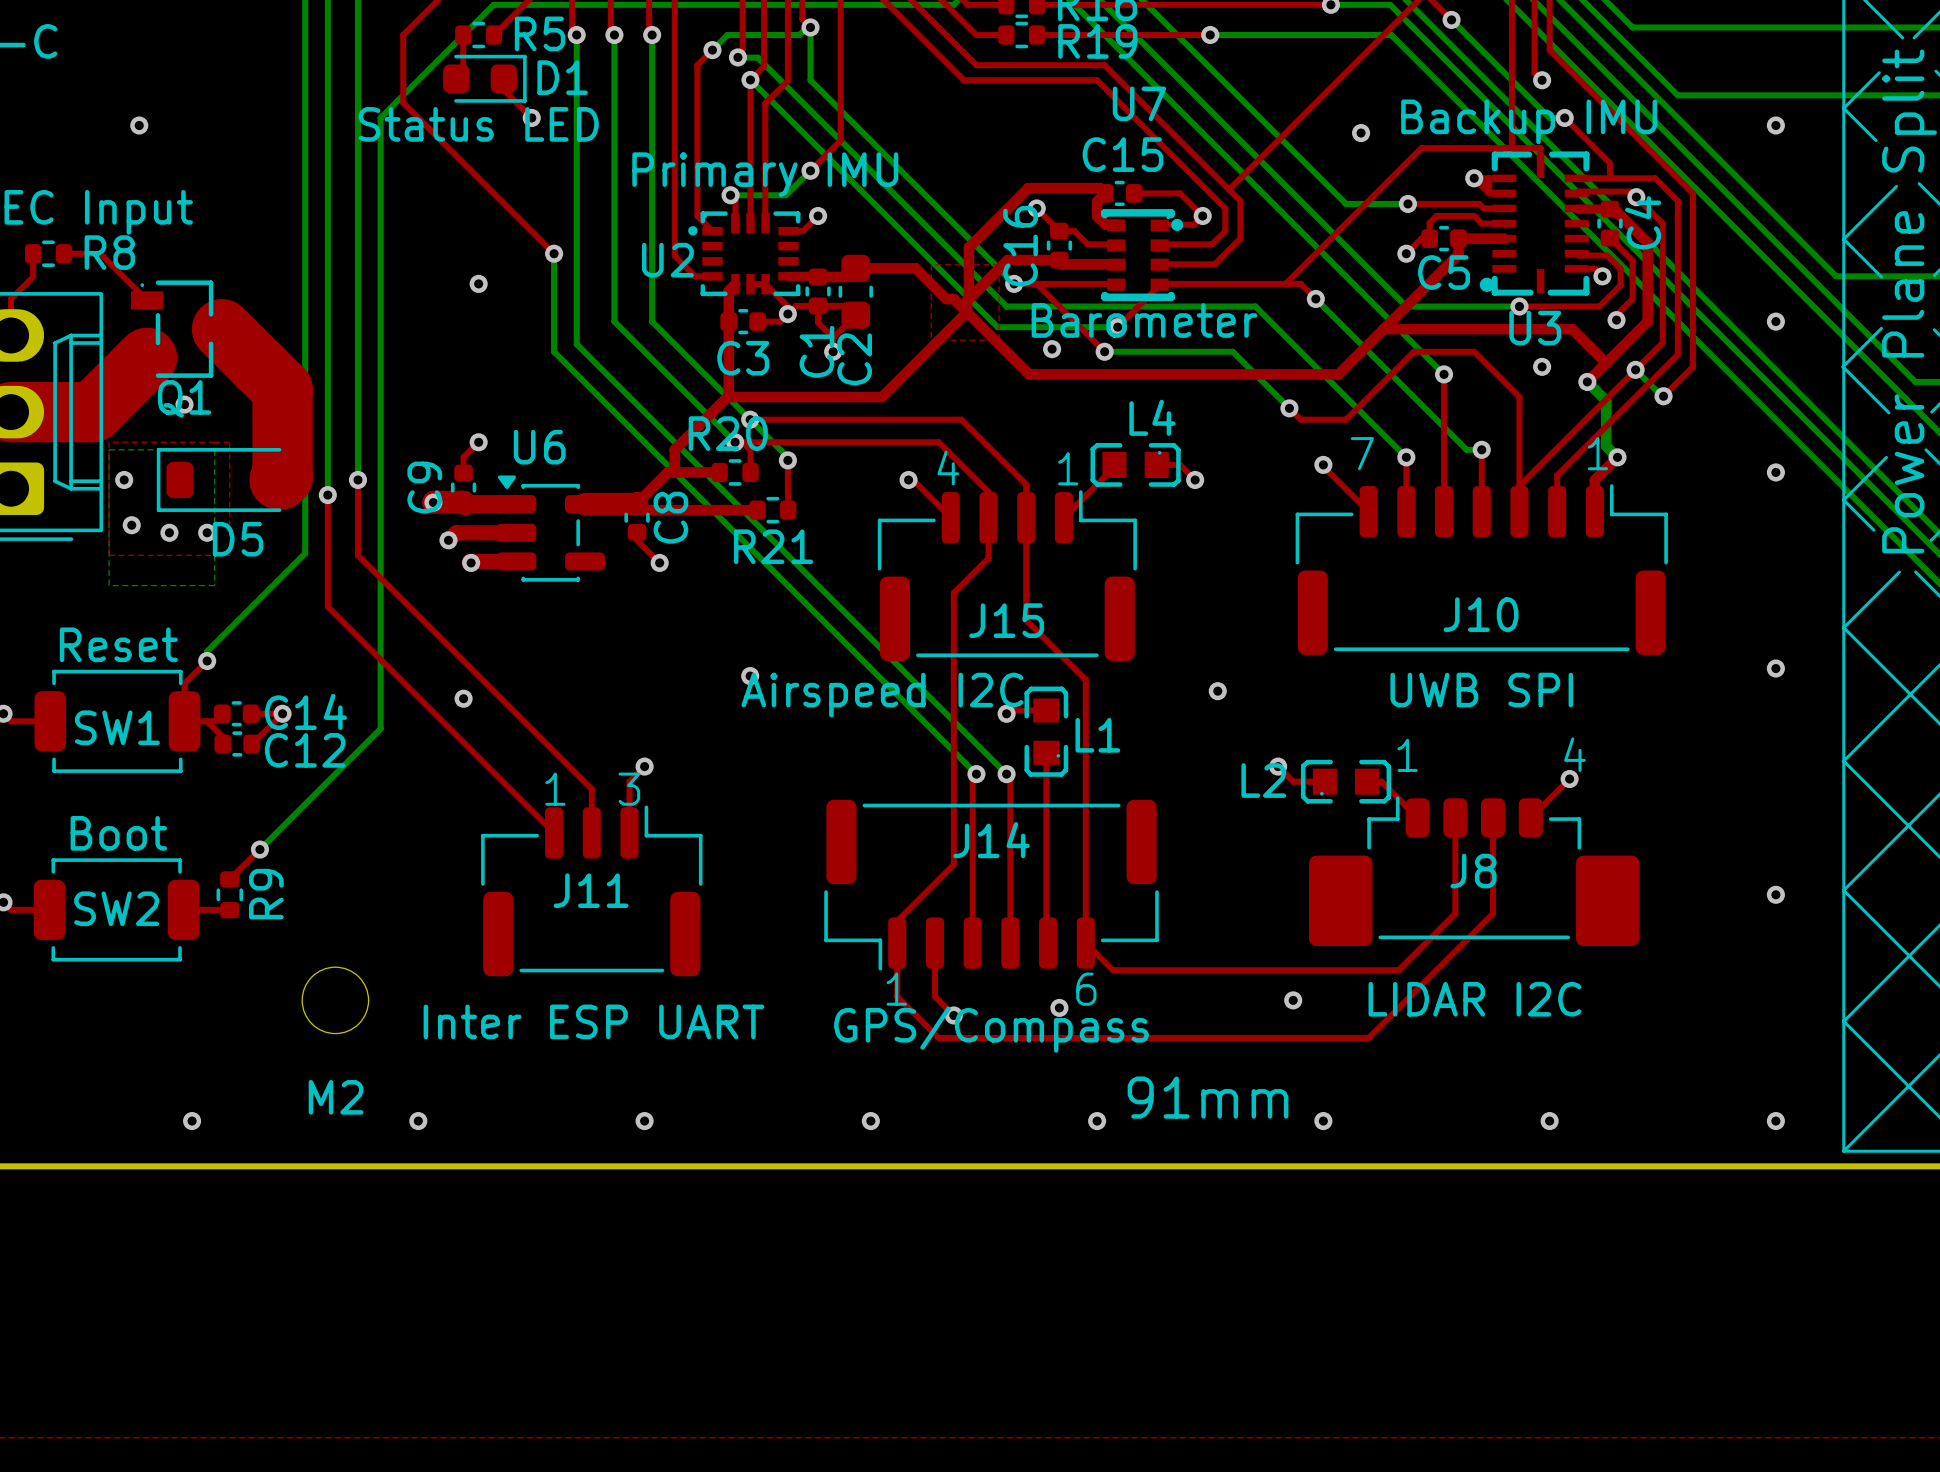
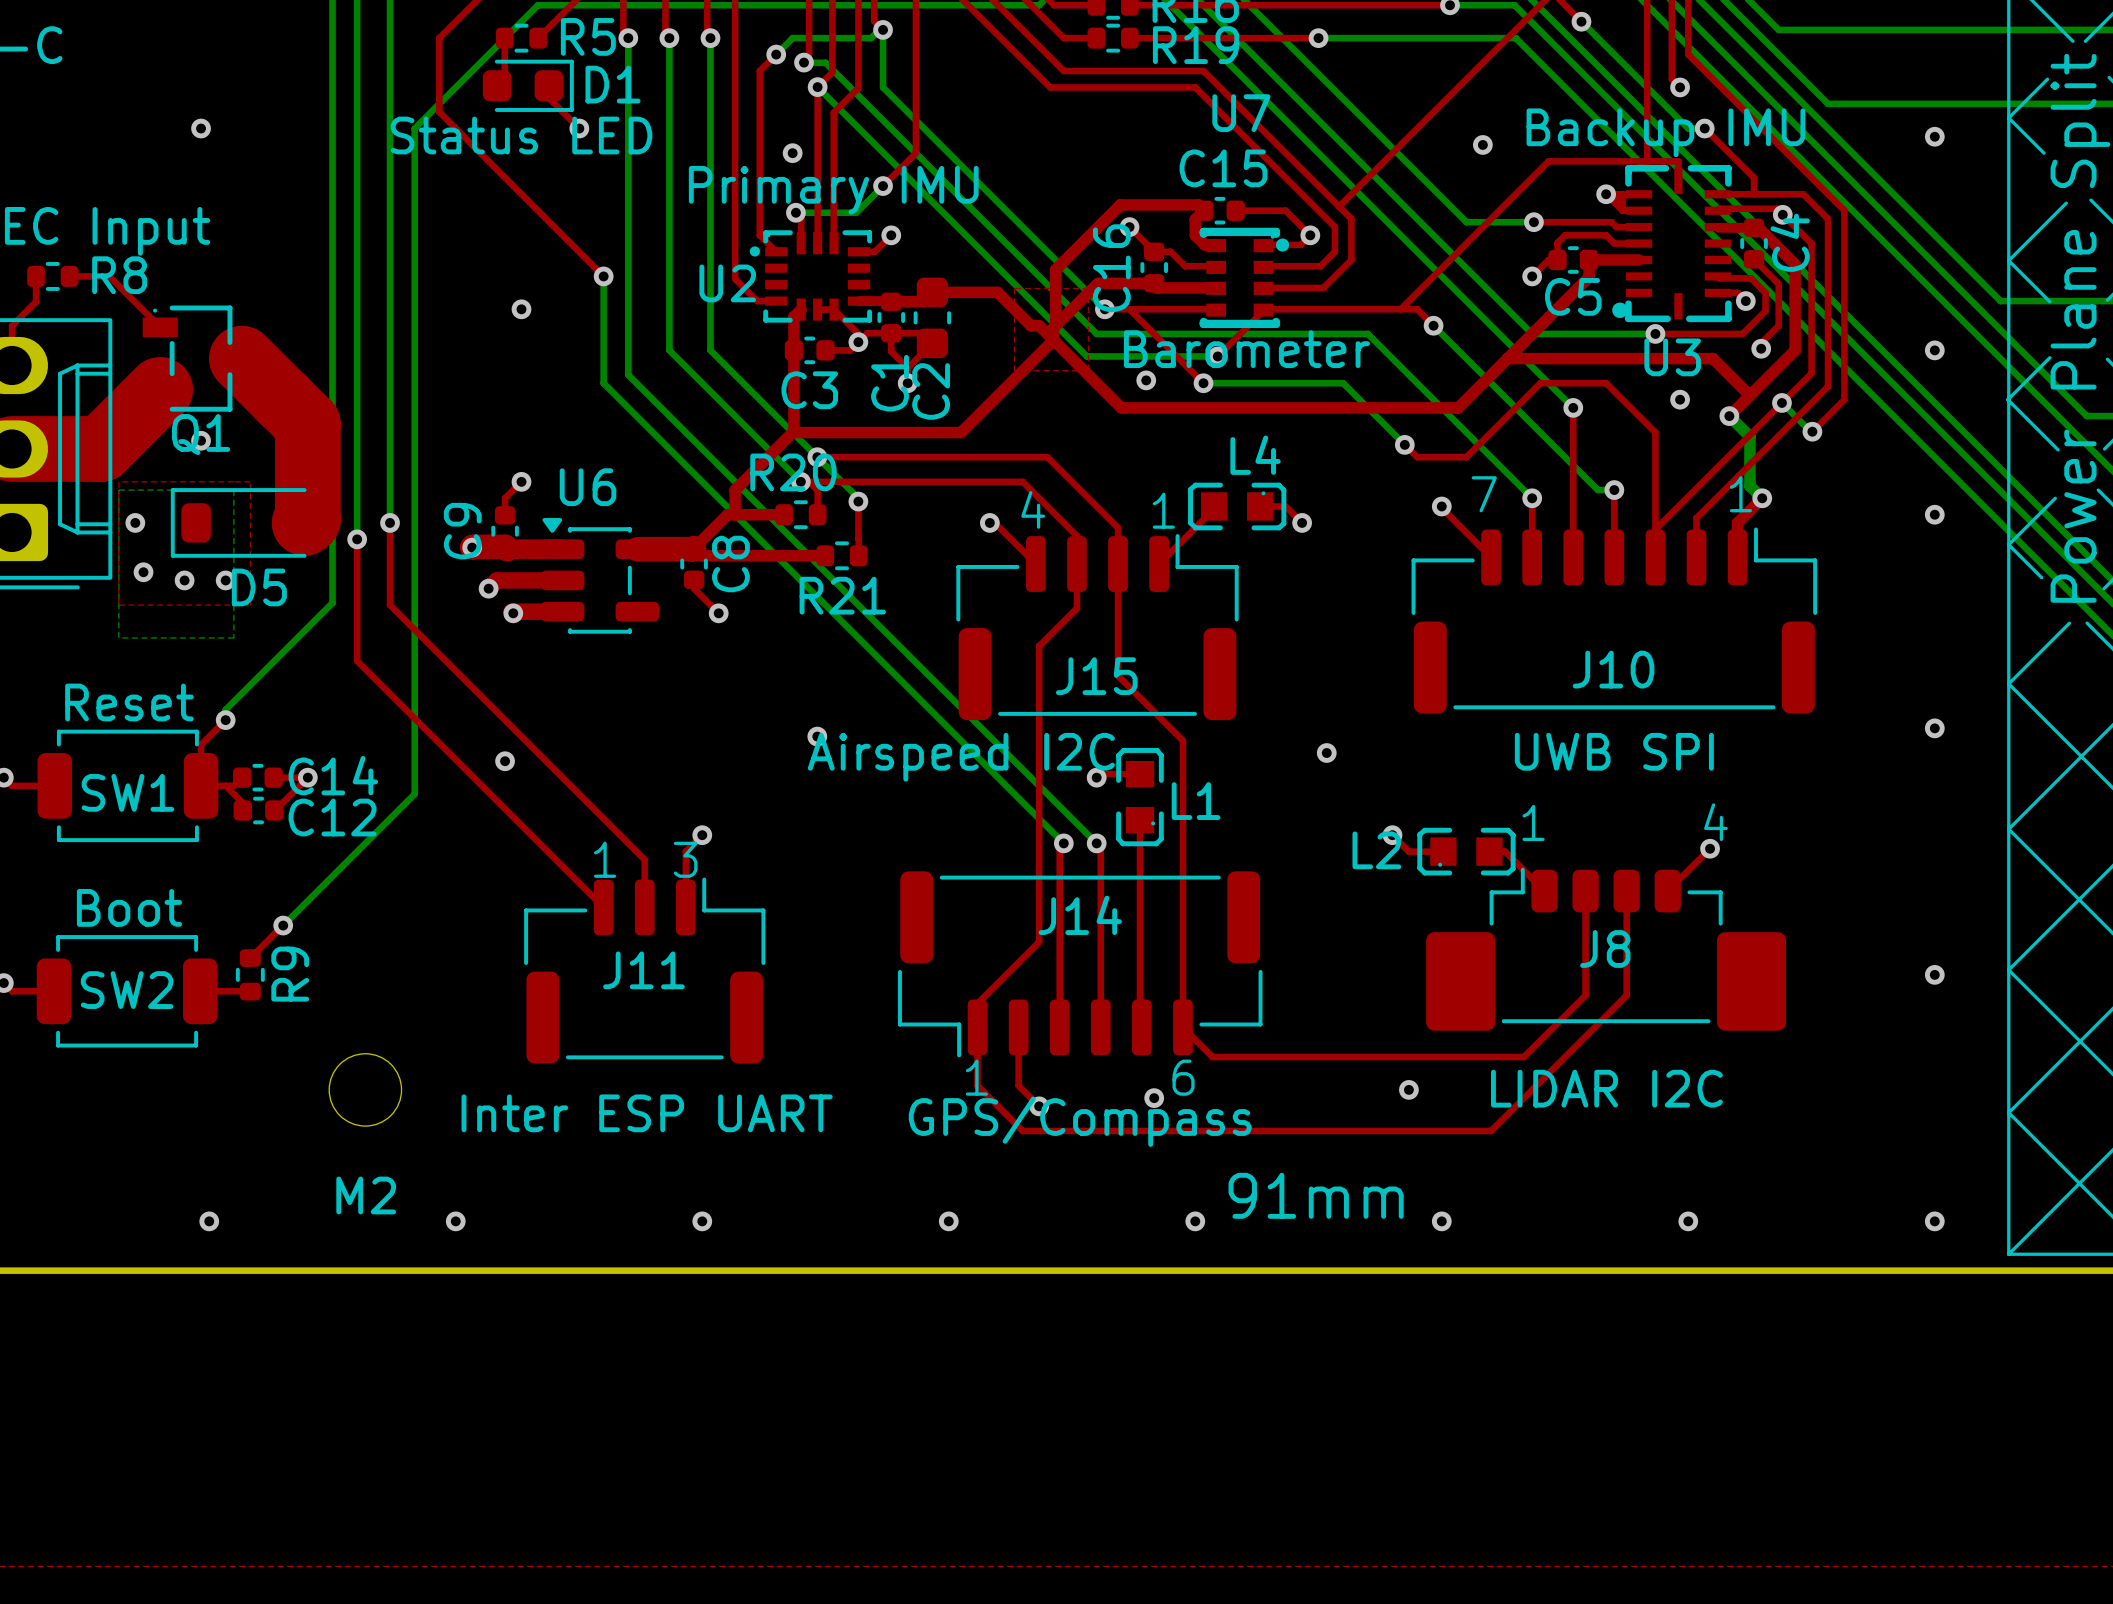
via position: (139, 125) -> (201, 128)
via: none -> (792, 153)

